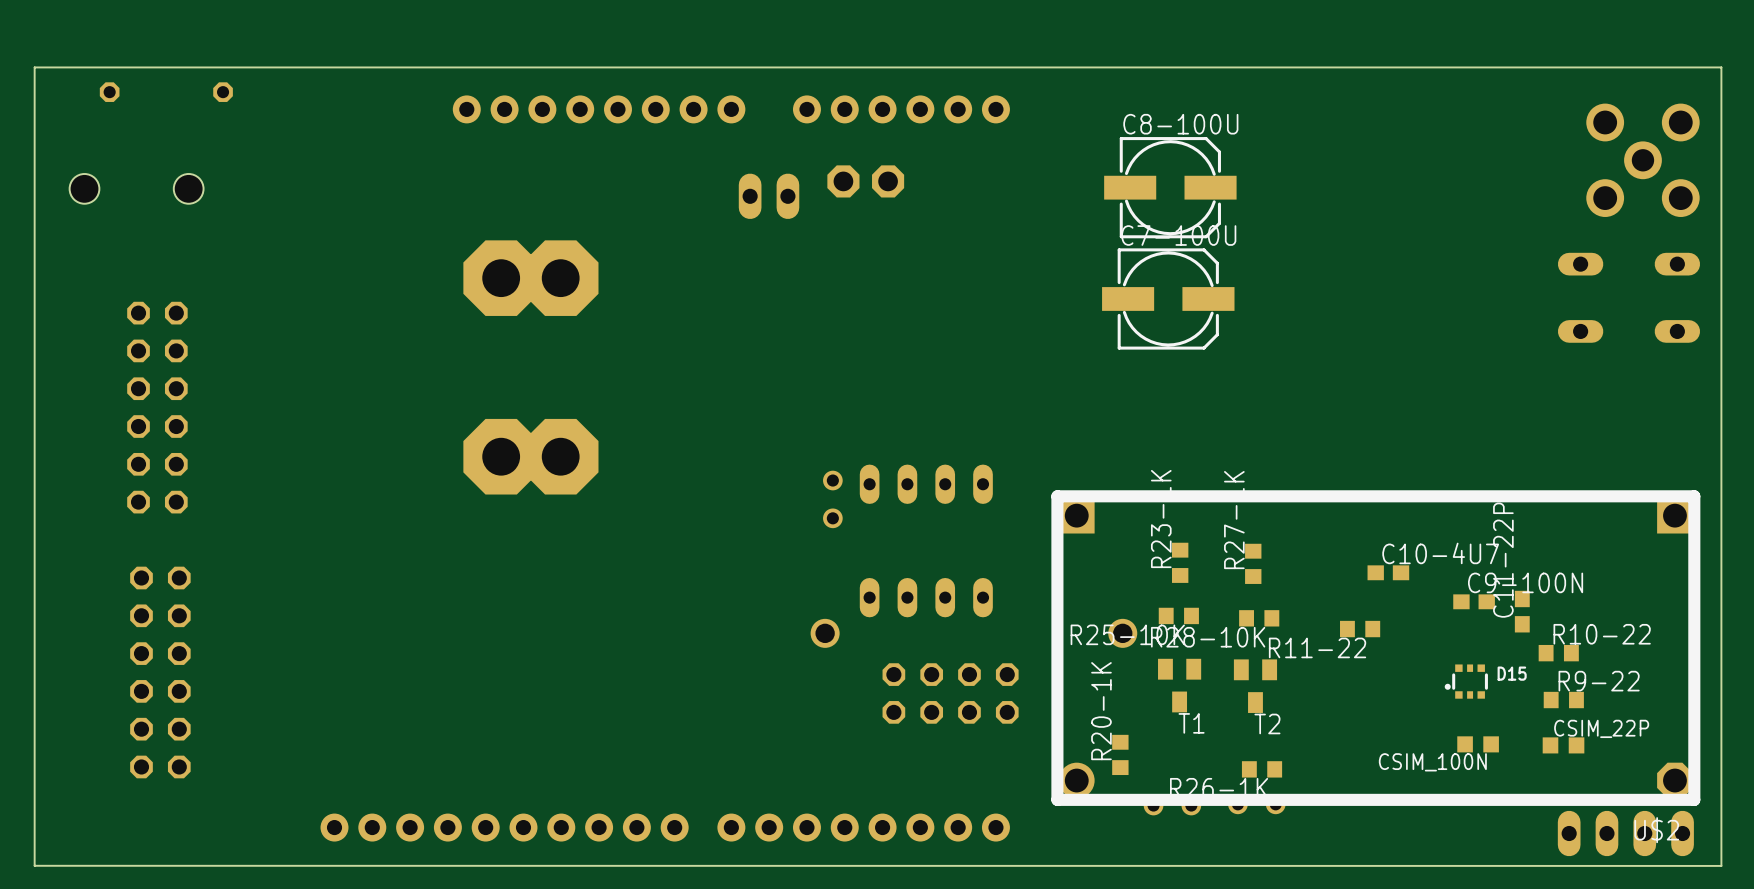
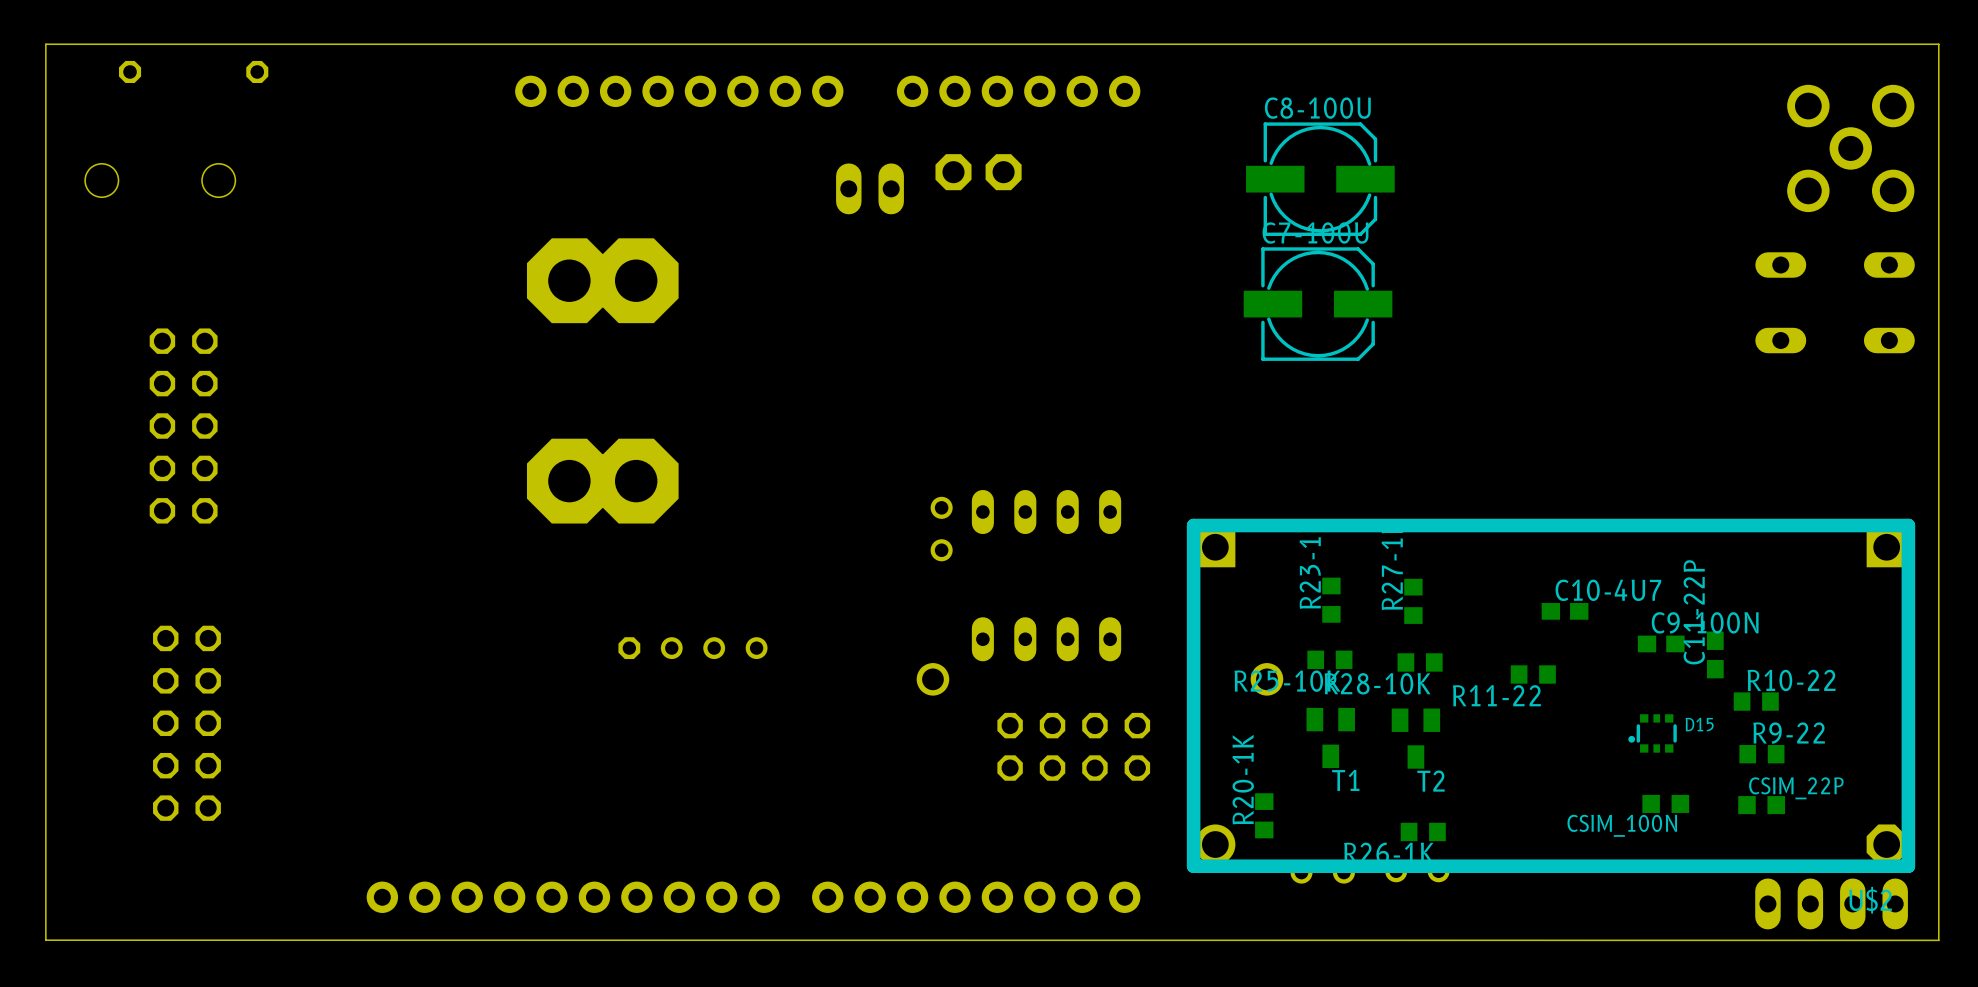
part footprint: [127, 301, 188, 514] -> [149, 328, 218, 524]
part footprint: [130, 566, 191, 779] -> [153, 625, 221, 821]
part: none -> (692, 648)

